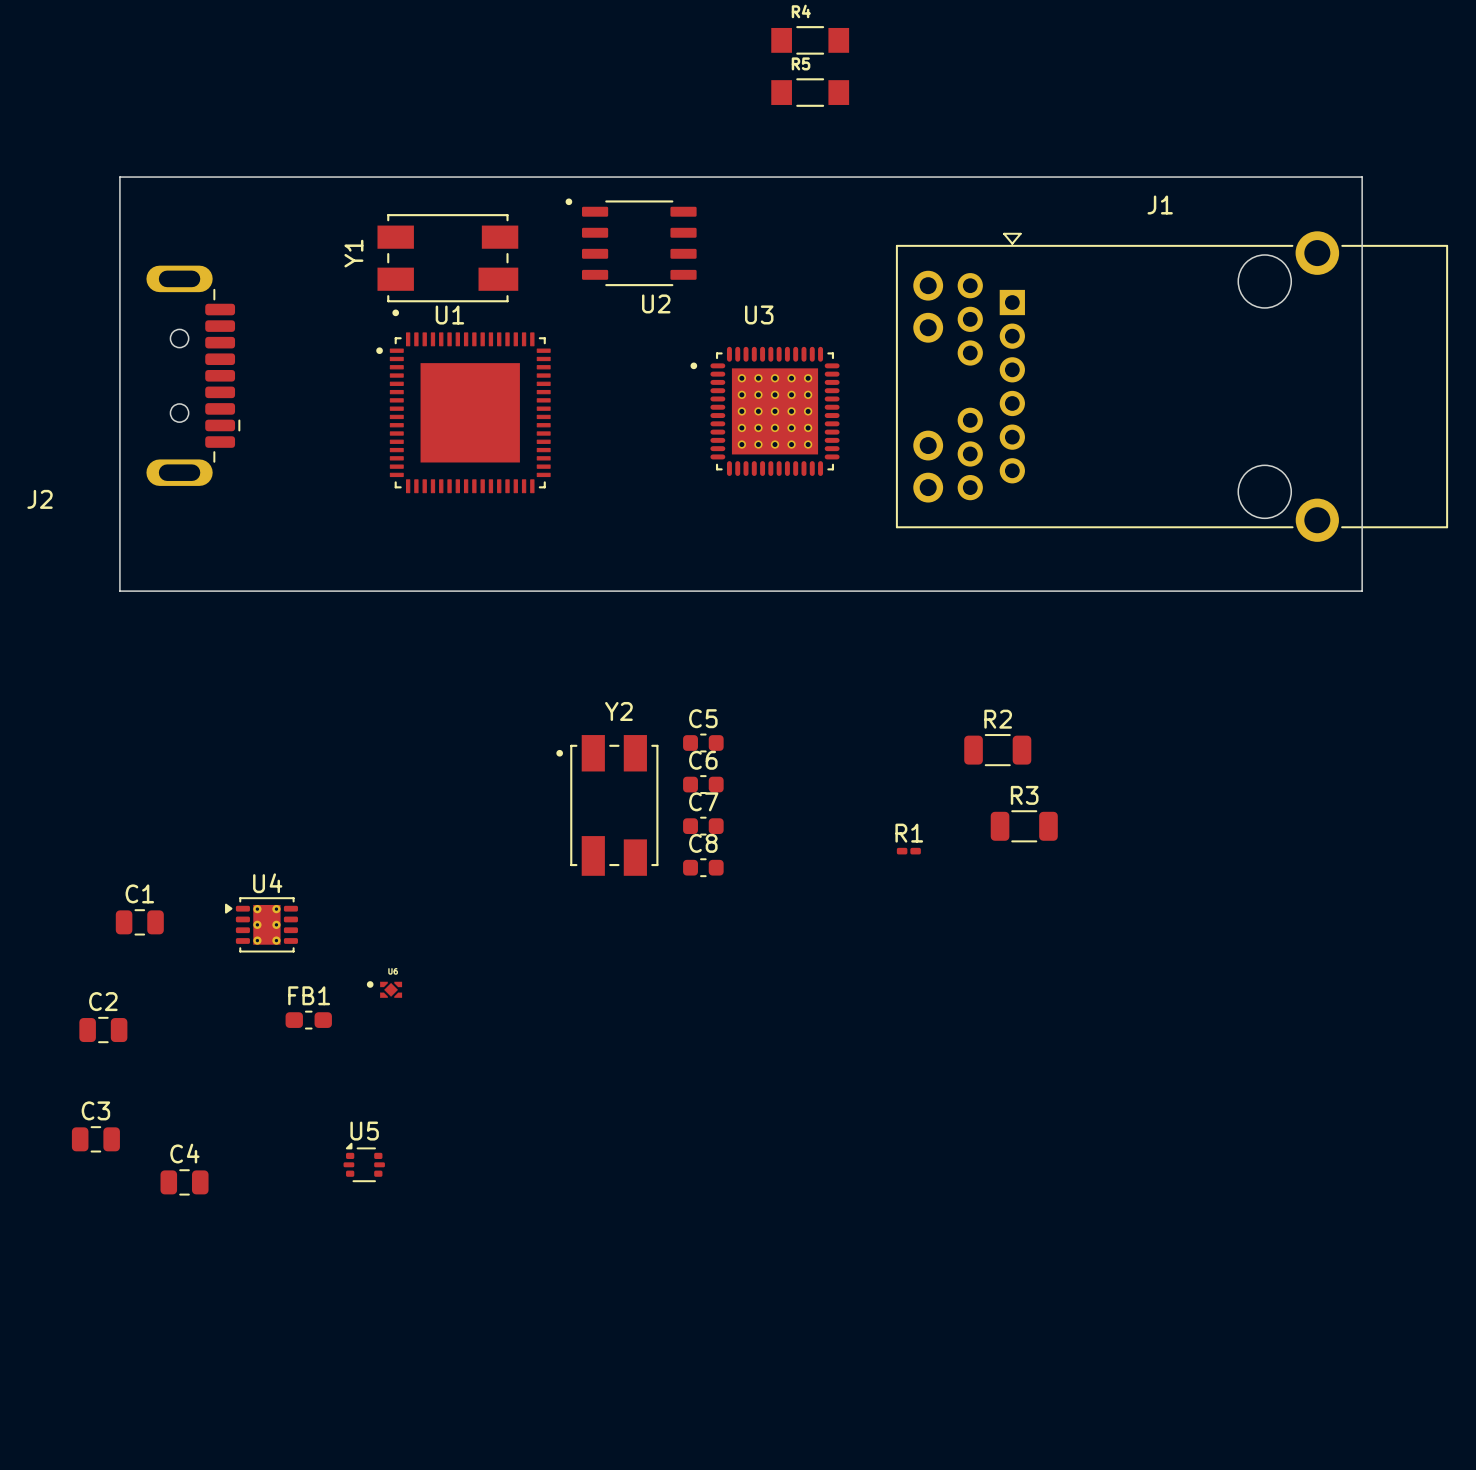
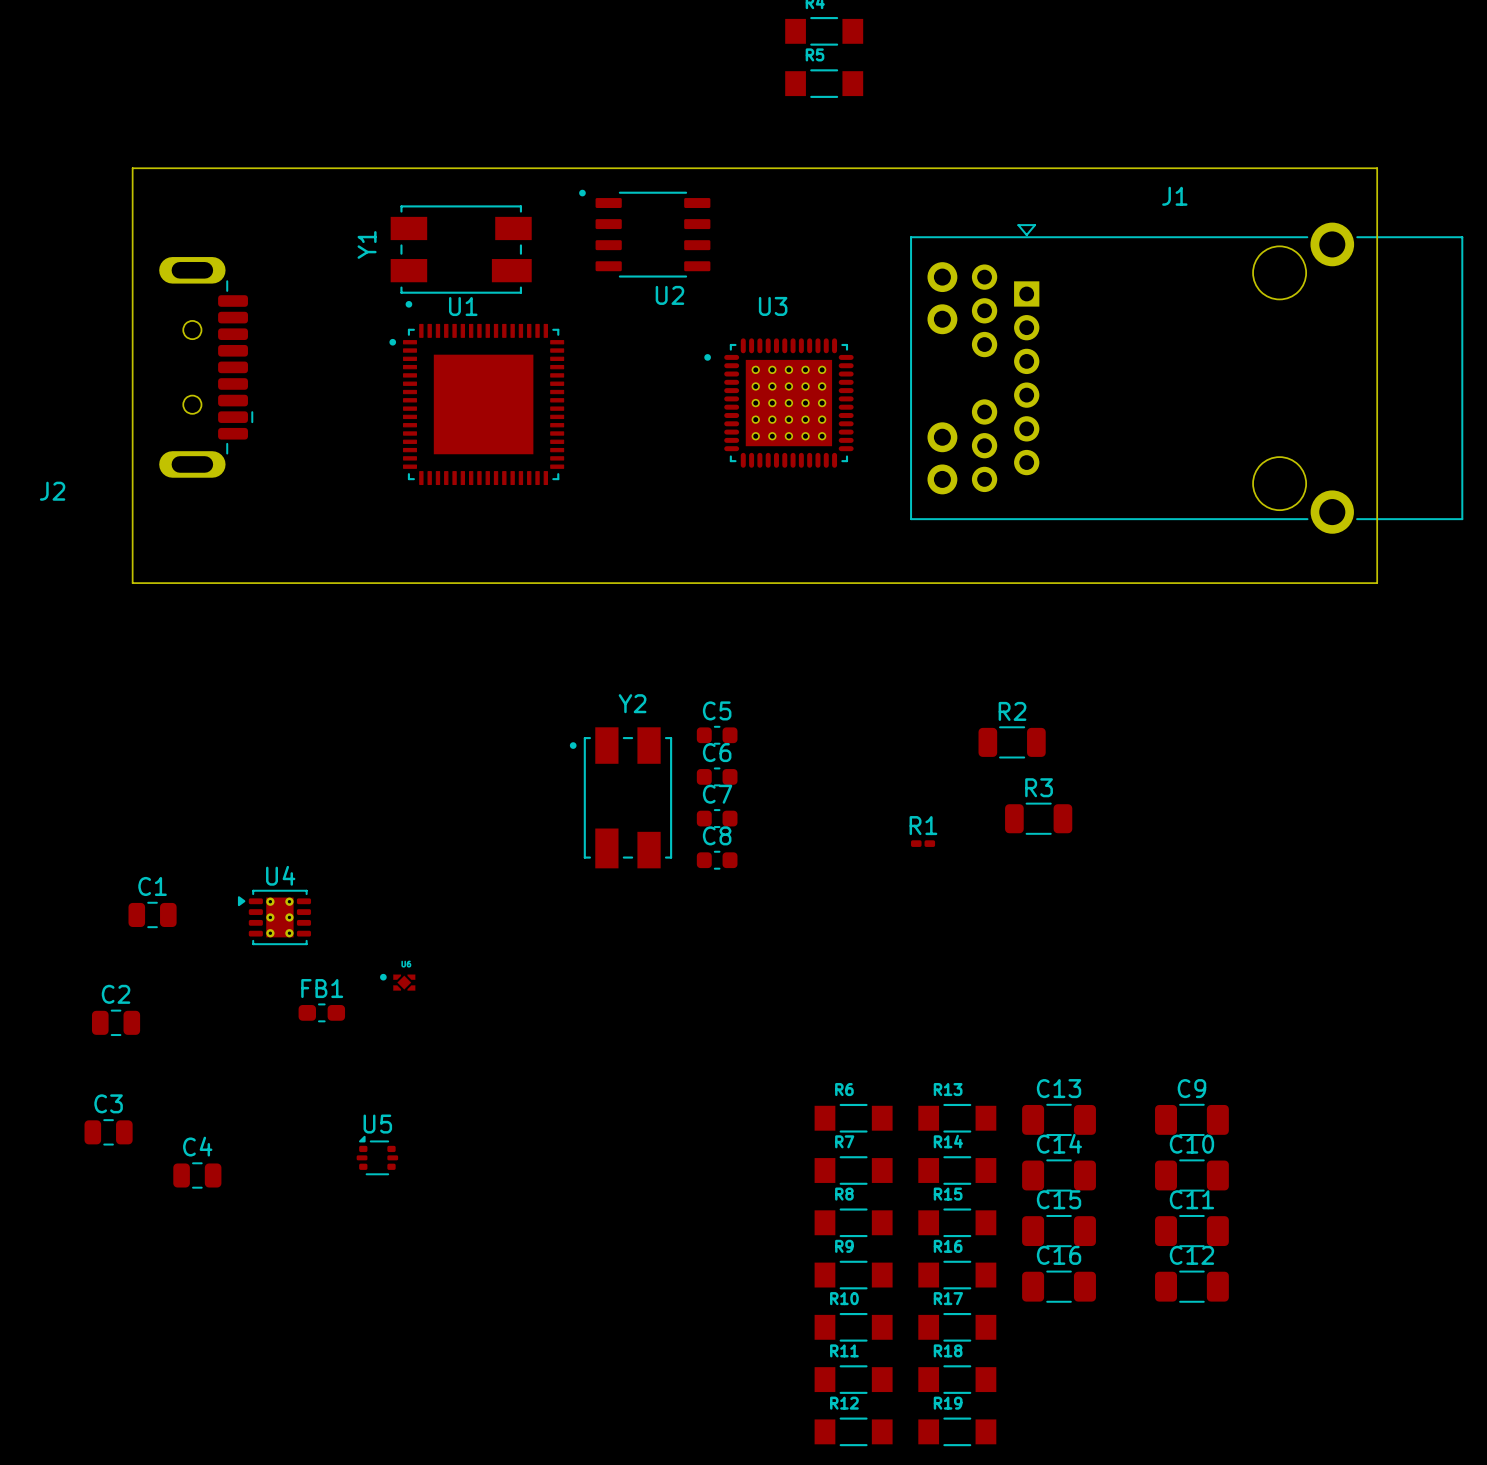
R6: none -> (853, 1118)
R13: none -> (957, 1118)
C13: none -> (1059, 1119)
C9: none -> (1191, 1119)
R7: none -> (853, 1170)
R14: none -> (957, 1170)
C14: none -> (1059, 1175)
C10: none -> (1191, 1175)
R8: none -> (853, 1222)
R15: none -> (957, 1222)
C15: none -> (1059, 1231)
C11: none -> (1191, 1231)
R9: none -> (853, 1275)
R16: none -> (957, 1275)
C16: none -> (1059, 1286)
C12: none -> (1191, 1286)
R10: none -> (853, 1327)
R17: none -> (957, 1327)
R11: none -> (853, 1379)
R18: none -> (957, 1379)
R12: none -> (853, 1431)
R19: none -> (957, 1431)

